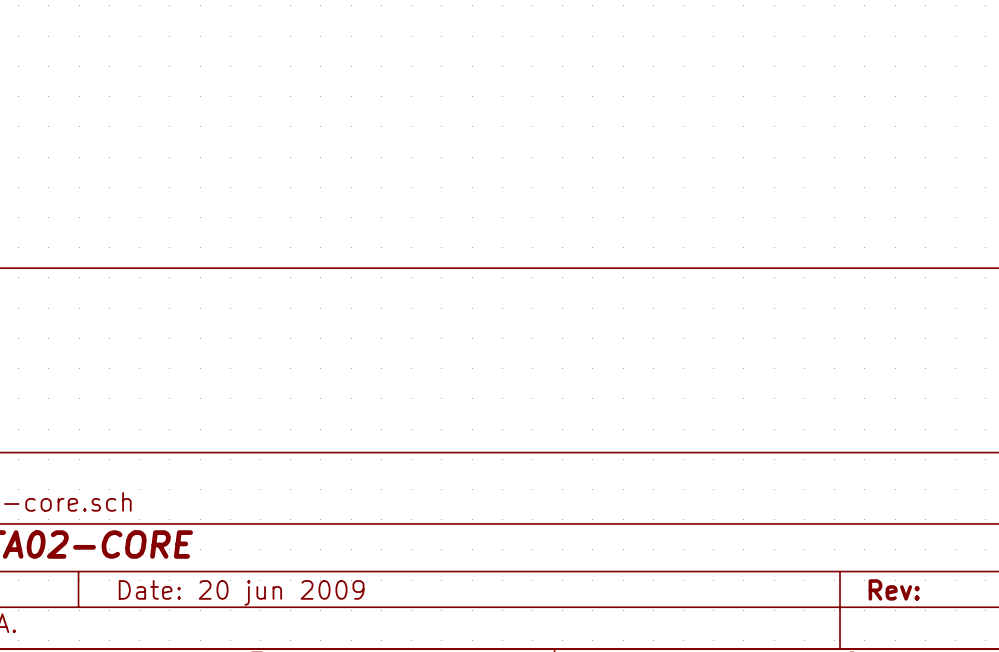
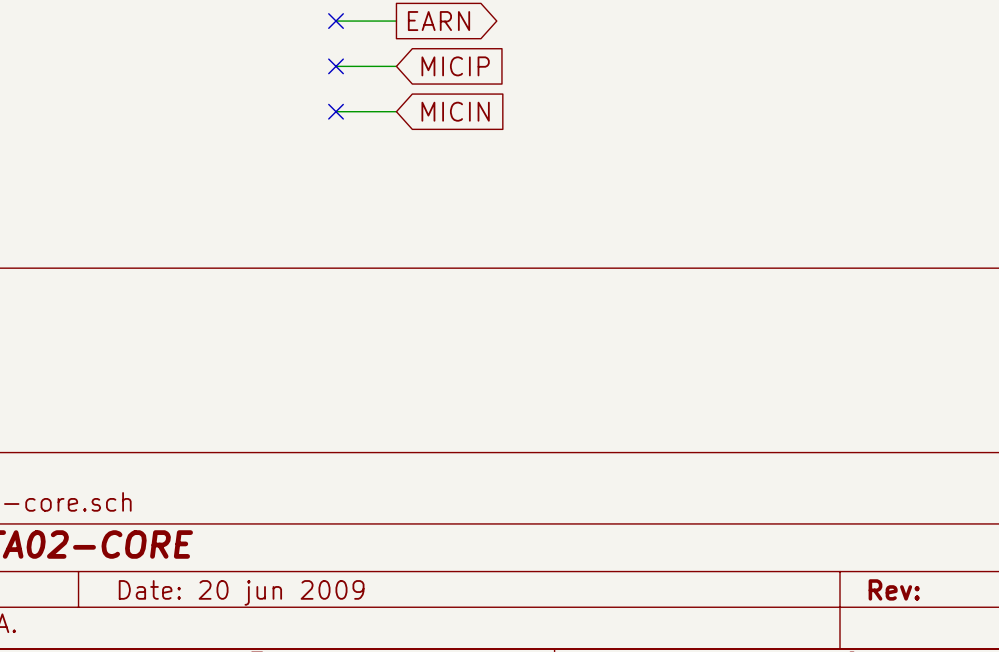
wire: none -> (336, 21) (396, 21)
no-connect mark: none -> (336, 21)
global label: none -> EARN (438, 21)
wire: none -> (336, 66) (396, 66)
no-connect mark: none -> (336, 66)
global label: none -> MICIP (455, 66)
wire: none -> (336, 111) (396, 111)
no-connect mark: none -> (336, 111)
global label: none -> MICIN (455, 111)

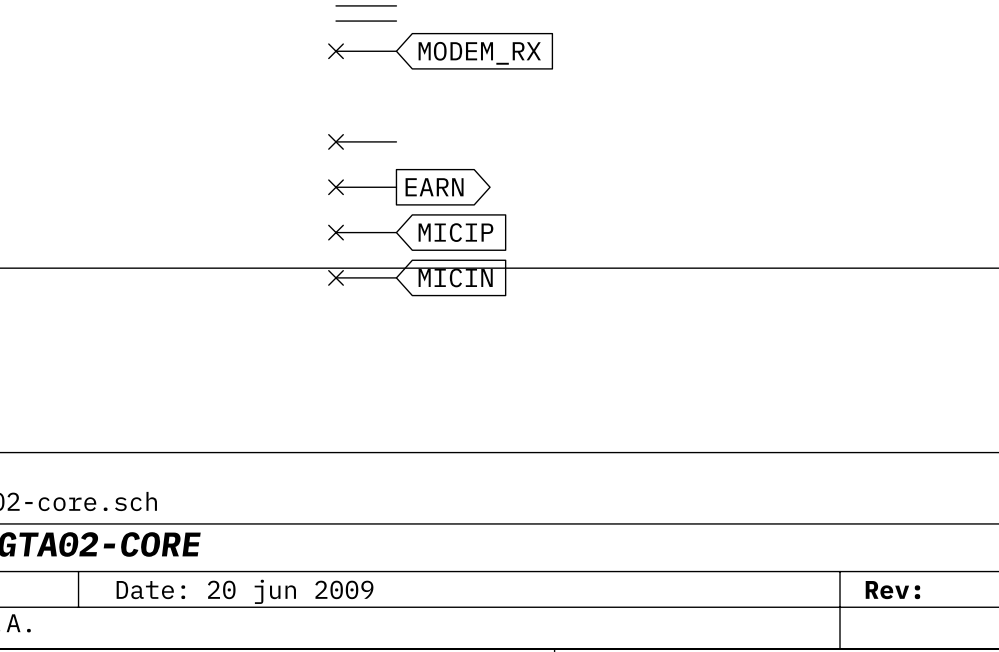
no-connect mark: (336, 21) -> none
global label position: EARN (438, 21) -> EARN (434, 187)
no-connect mark: none -> (336, 51)
global label: none -> MODEM_RX (479, 53)
wire: (336, 66) (396, 66) -> (336, 5) (396, 5)
no-connect mark: (336, 66) -> none
global label position: MICIP (455, 66) -> MICIP (455, 232)
wire: (336, 111) (396, 111) -> (336, 51) (396, 51)
no-connect mark: (336, 111) -> none
global label position: MICIN (455, 111) -> MICIN (455, 277)
wire: none -> (336, 141) (396, 141)
no-connect mark: none -> (336, 141)
wire: none -> (336, 187) (396, 187)
no-connect mark: none -> (336, 187)
wire: none -> (336, 232) (396, 232)
no-connect mark: none -> (336, 232)
wire: none -> (336, 277) (396, 277)
no-connect mark: none -> (336, 277)

